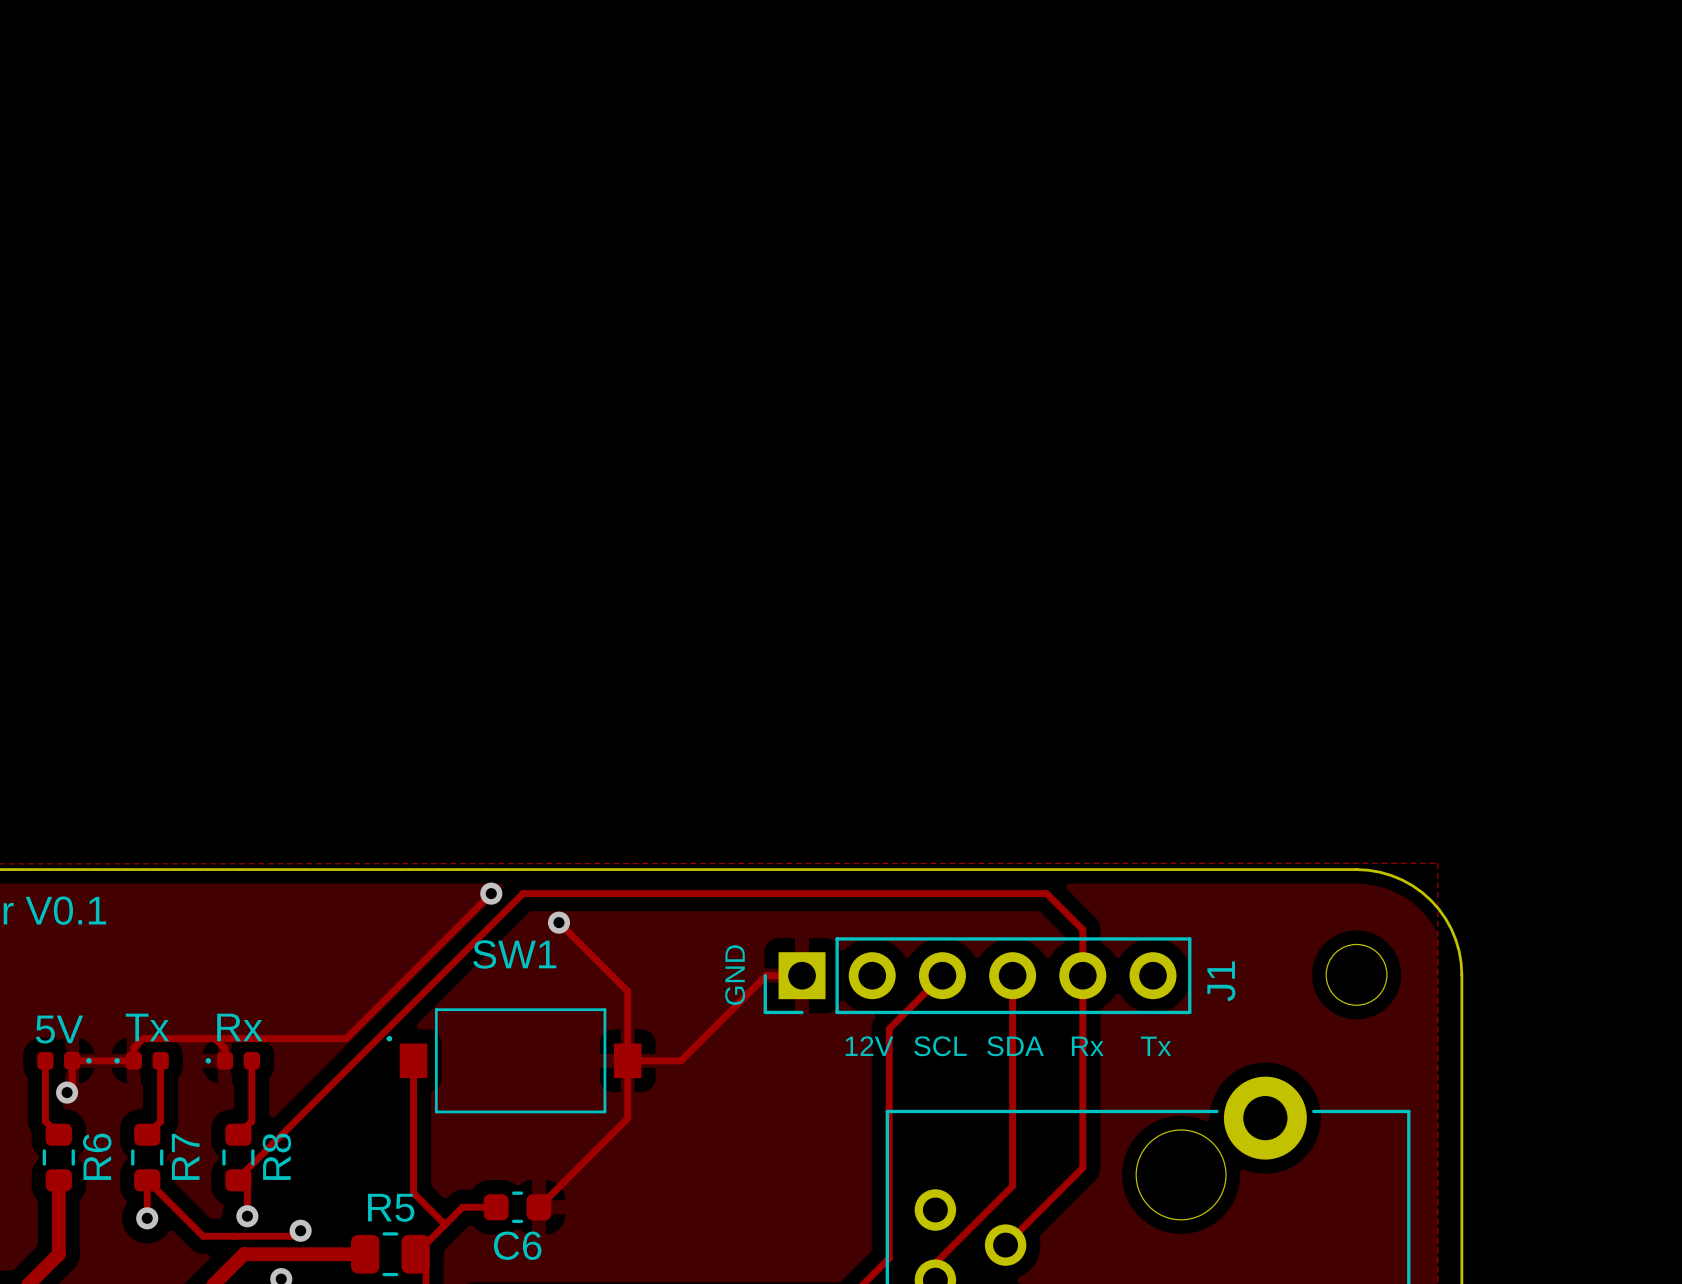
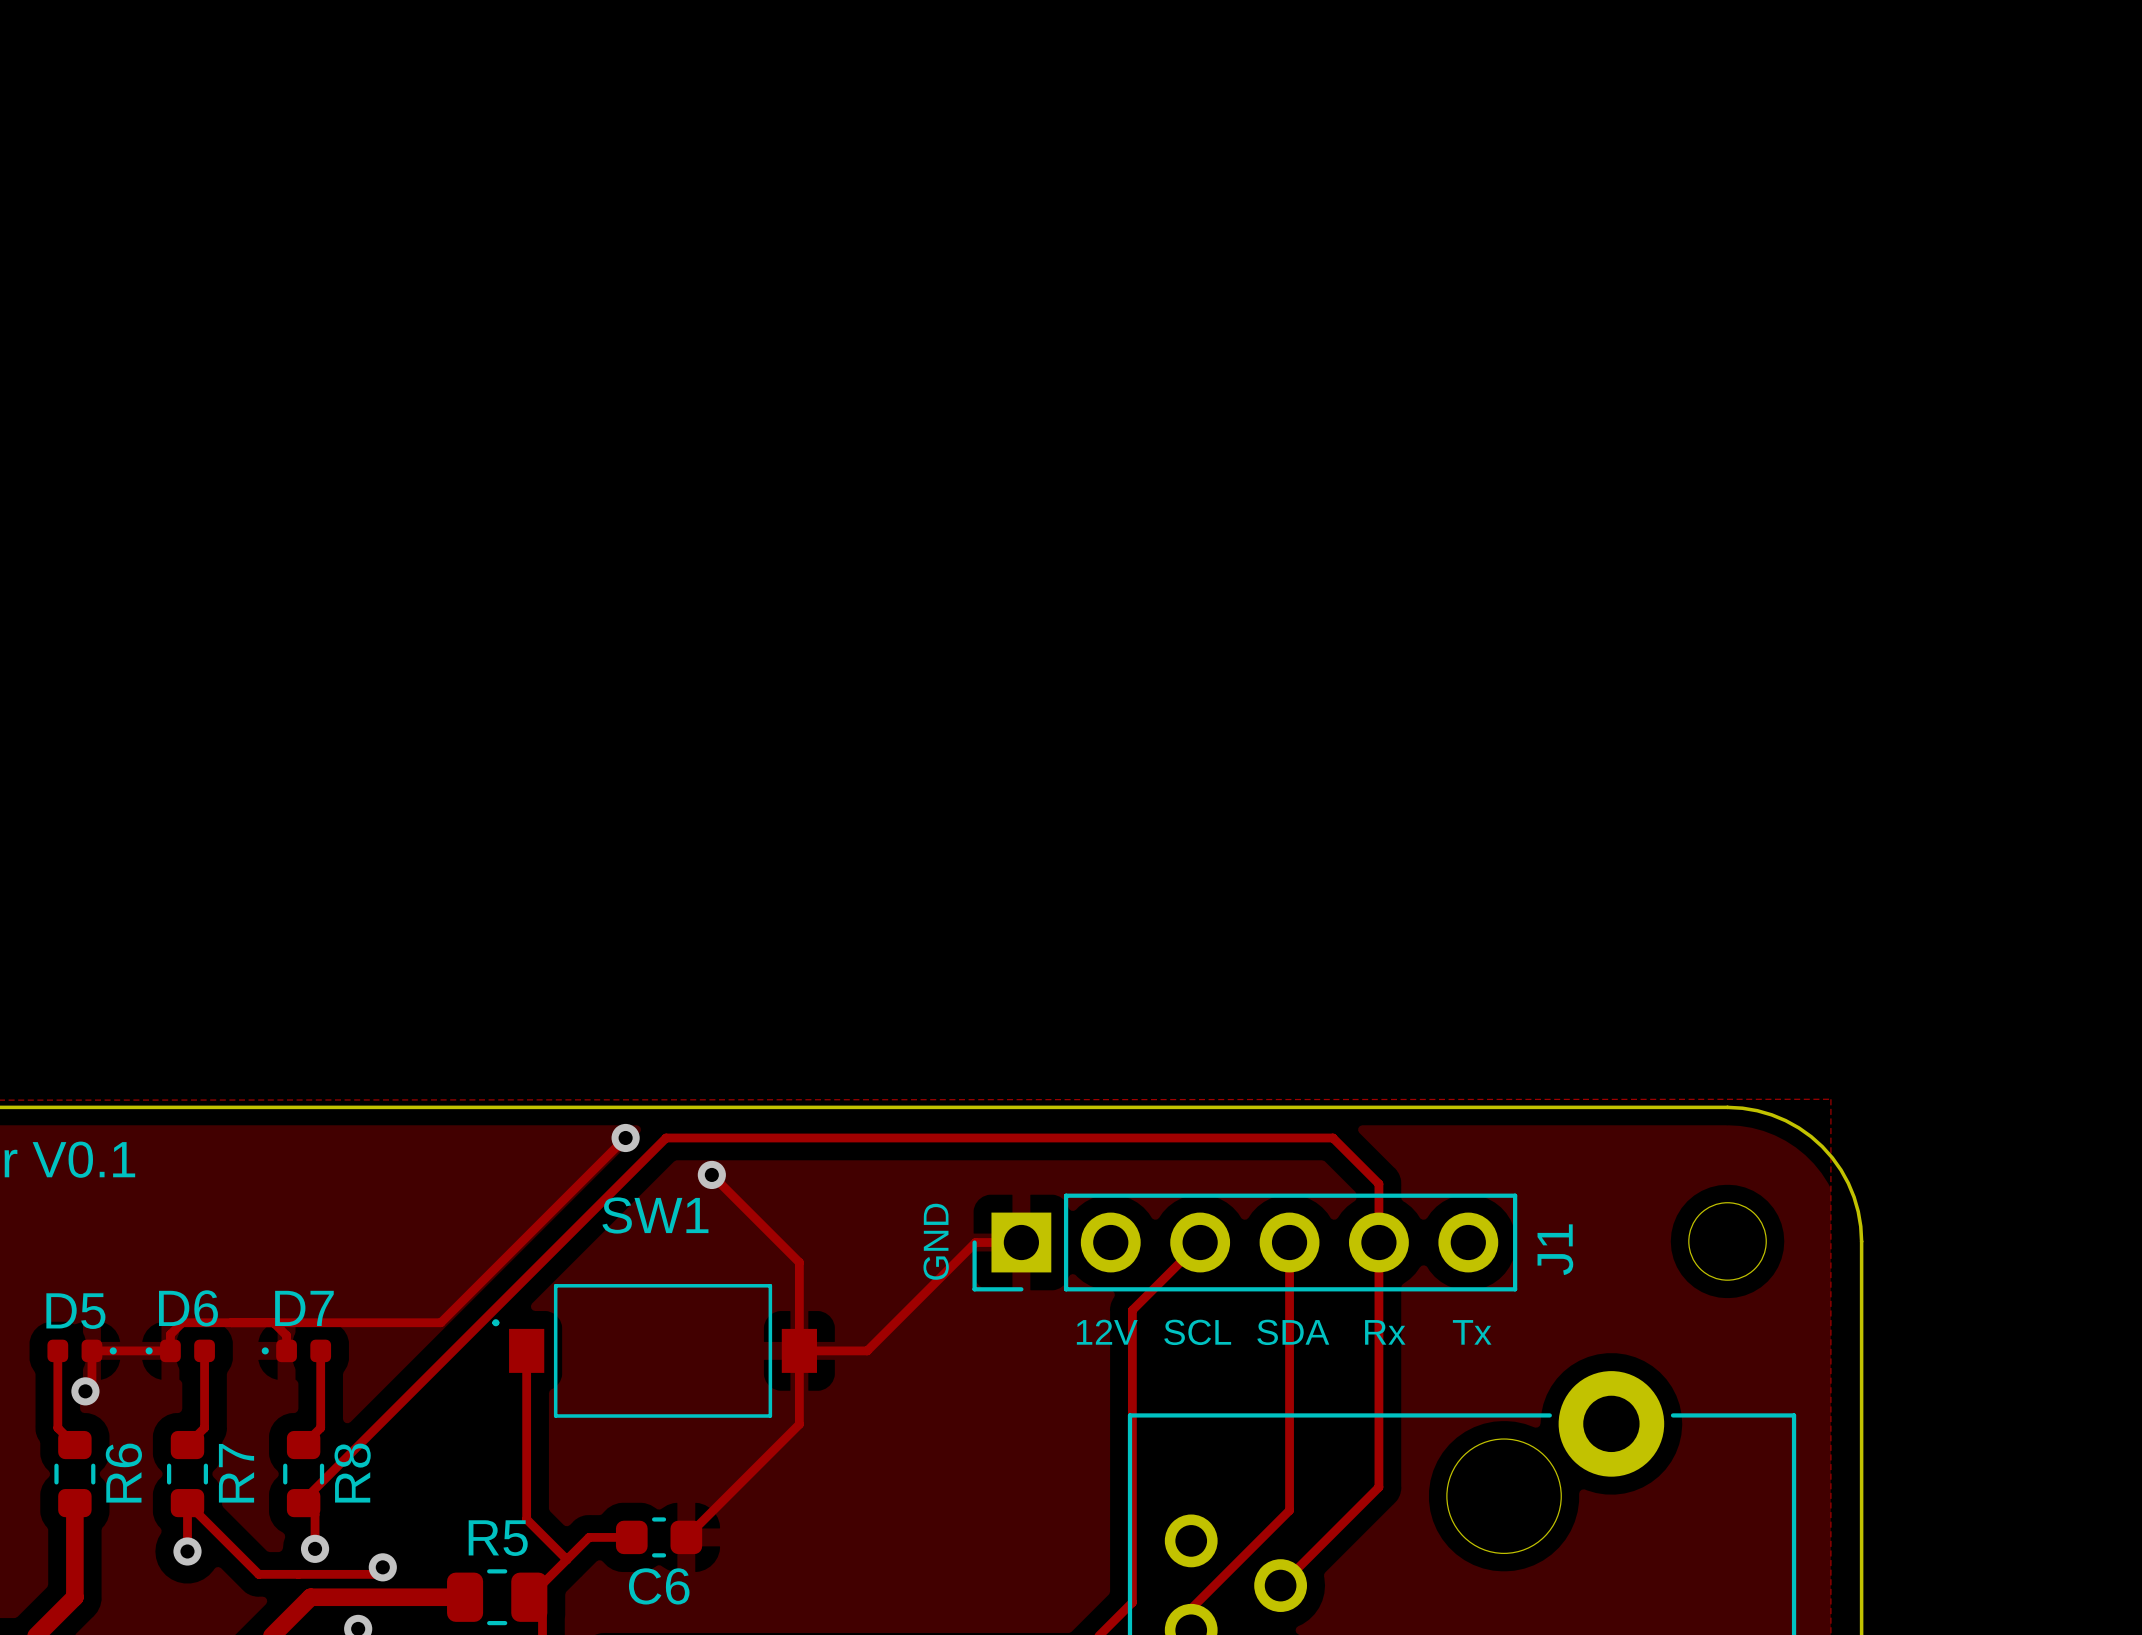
Tx name: Tx (147, 1027) -> D6 (188, 1308)
Rx name: Rx (239, 1027) -> D7 (304, 1308)
5V name: 5V (59, 1029) -> D5 (75, 1311)

